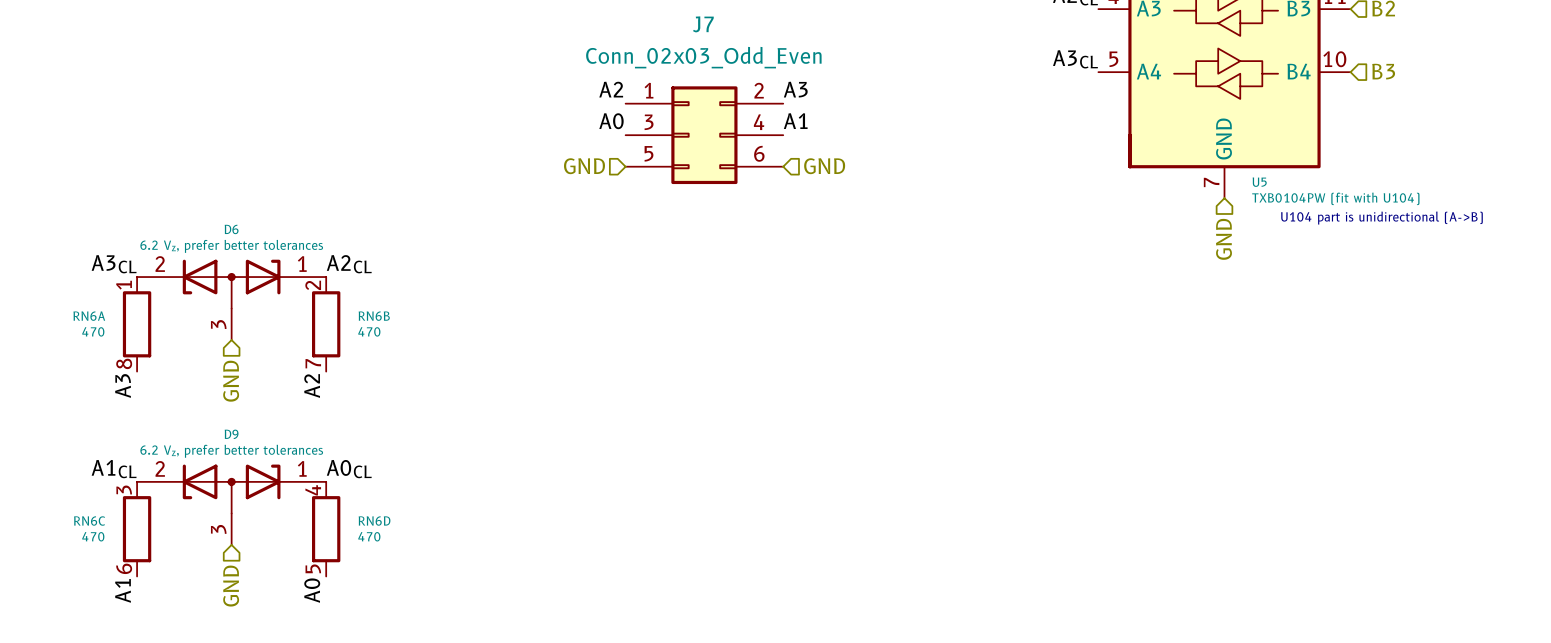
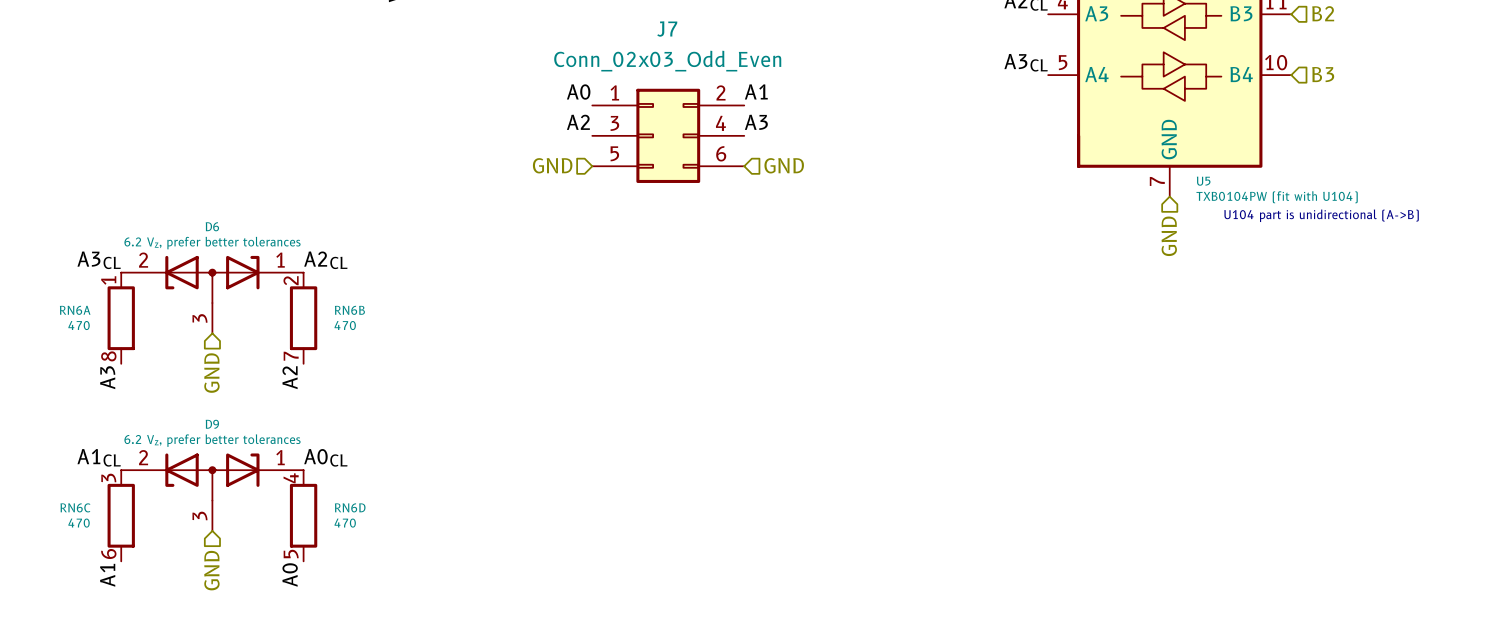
label: A2 (611, 89) -> A0 (578, 92)
label: A3 (795, 89) -> A1 (756, 91)
label: A0 (611, 121) -> A2 (578, 122)
label: A1 (795, 121) -> A3 (756, 122)

